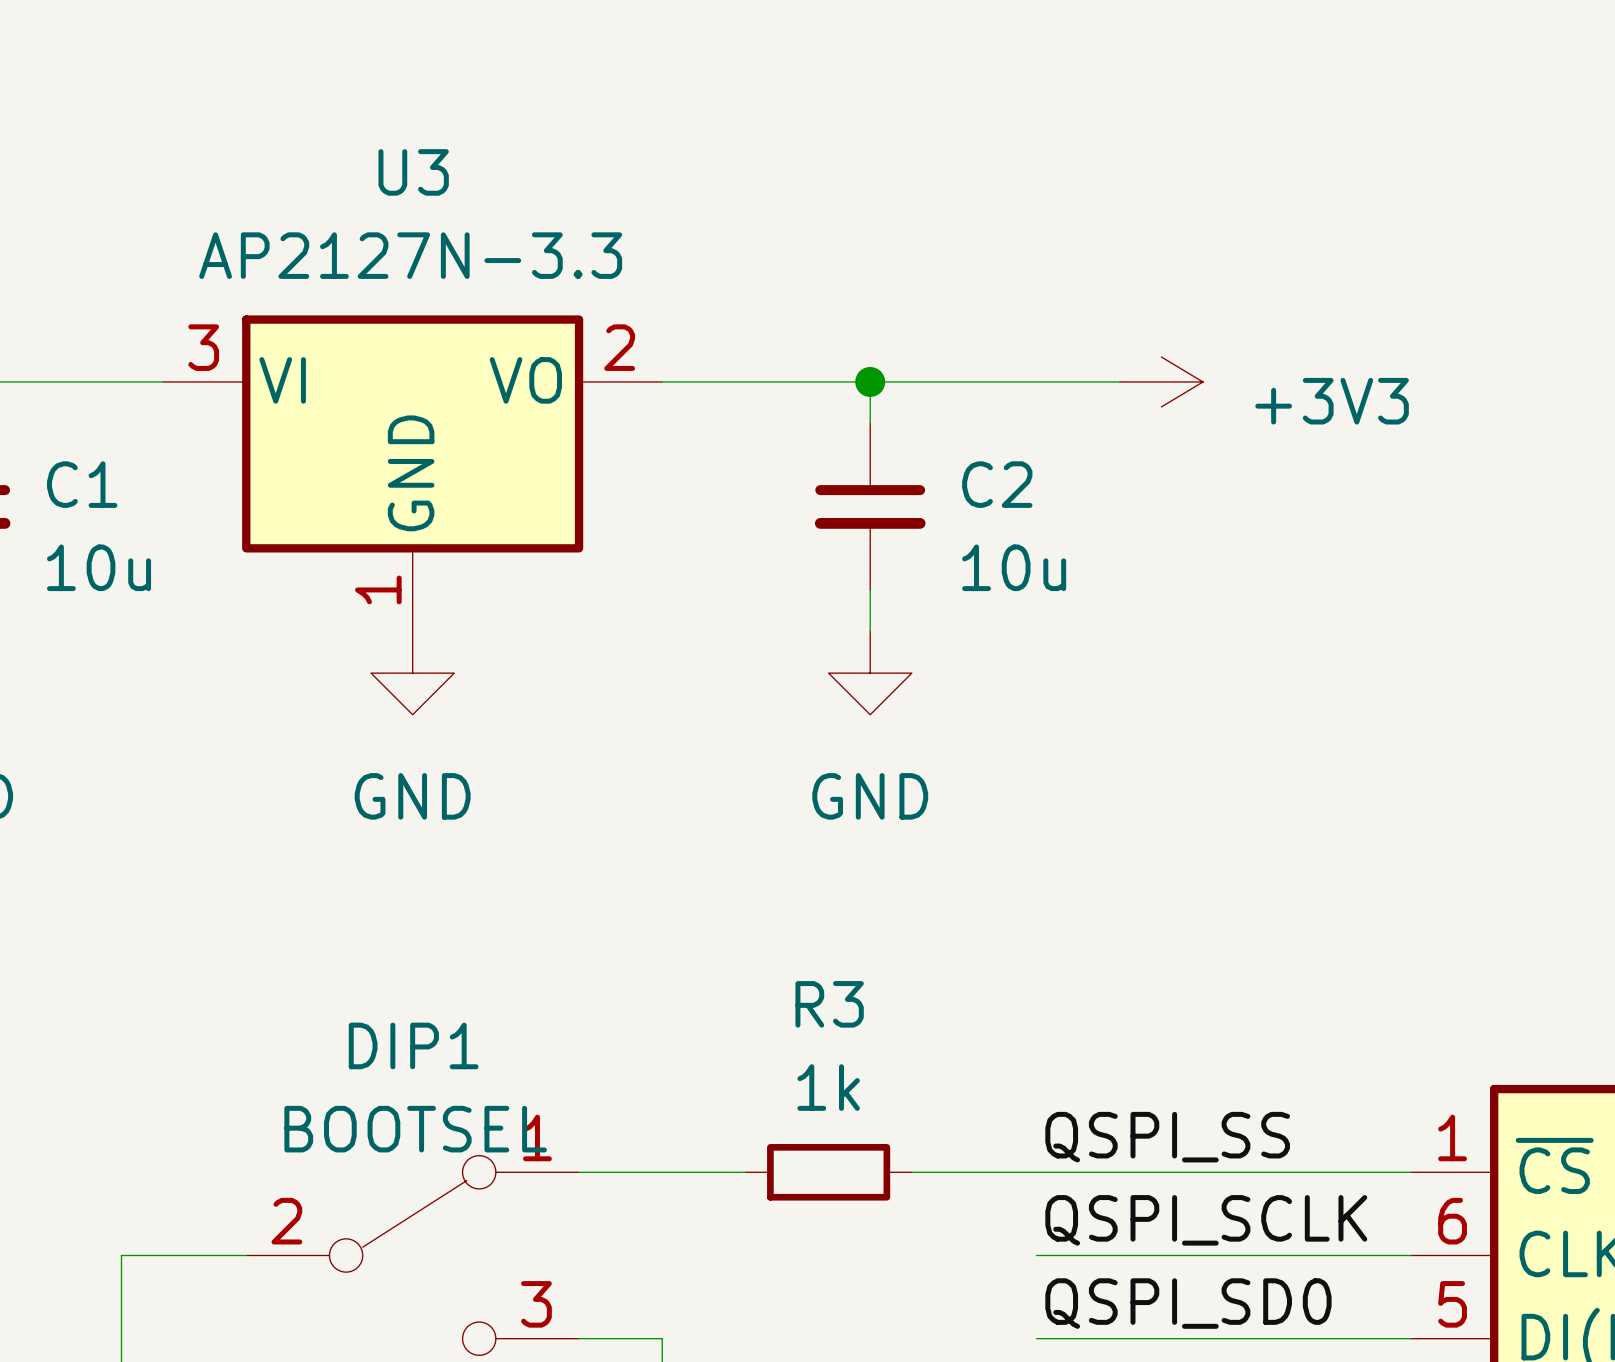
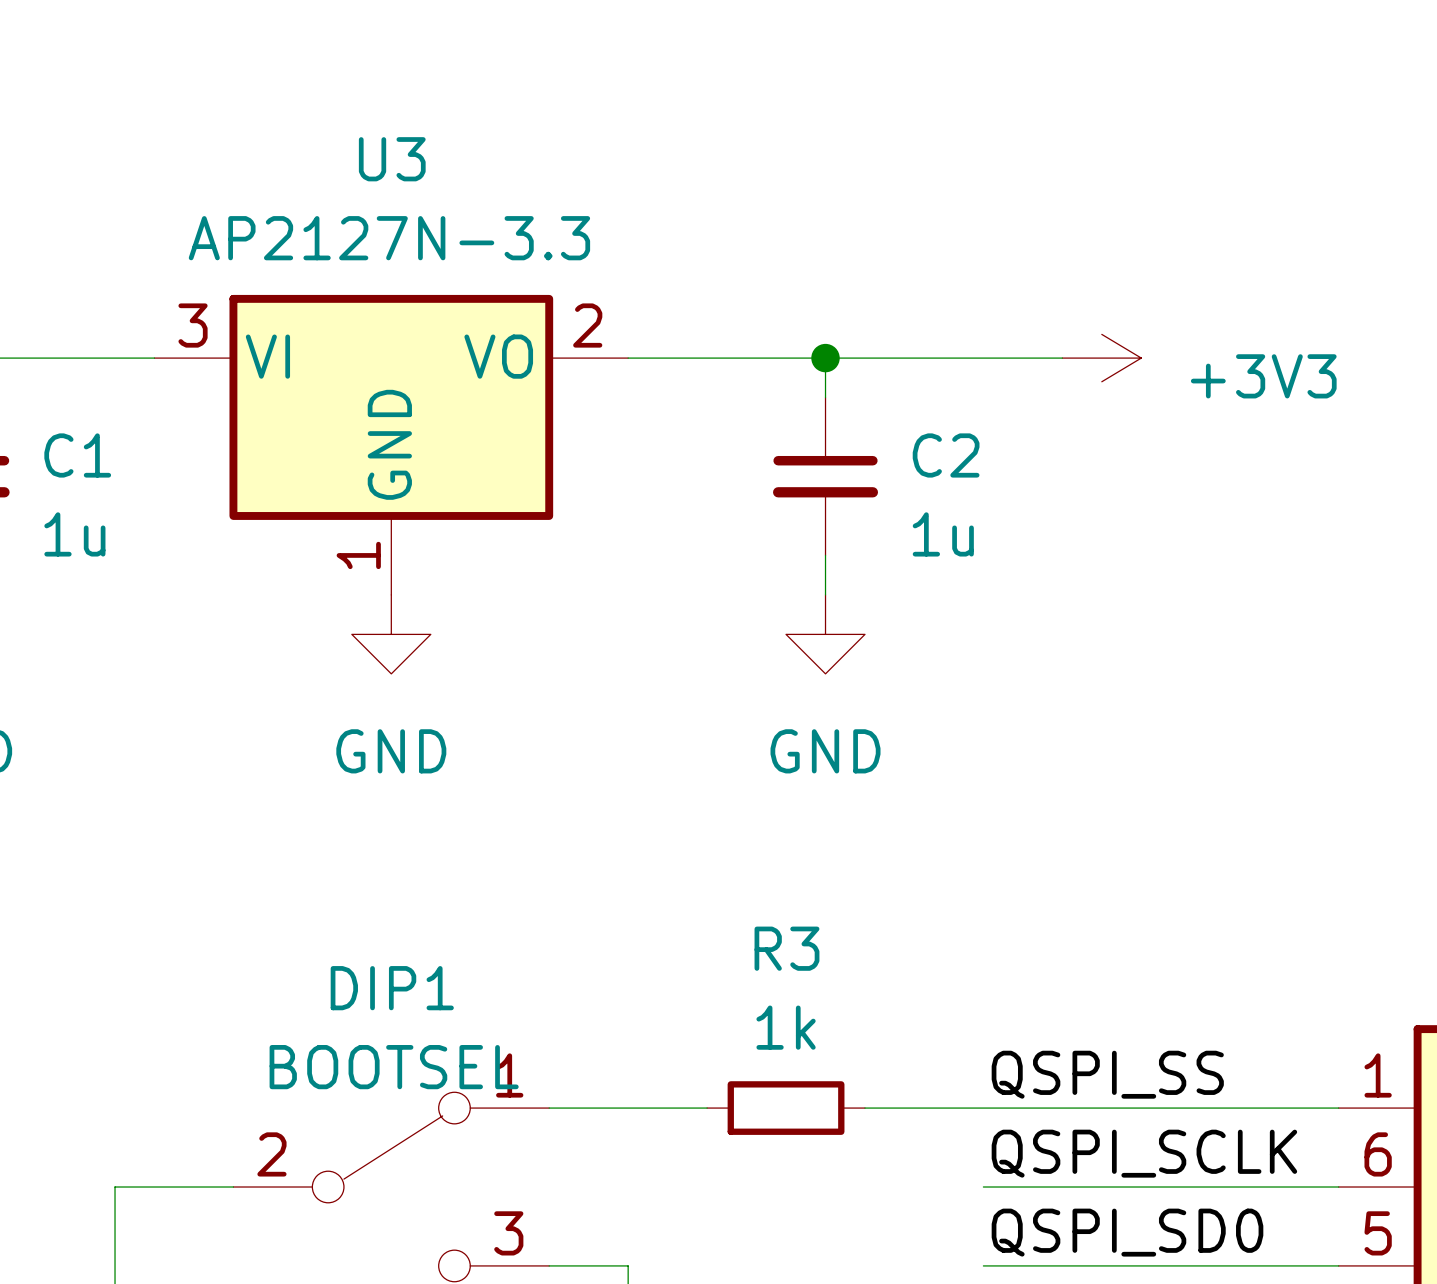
C1 value: 10u (99, 567) -> 1u (74, 534)
C2 value: 10u (1014, 567) -> 1u (943, 534)

